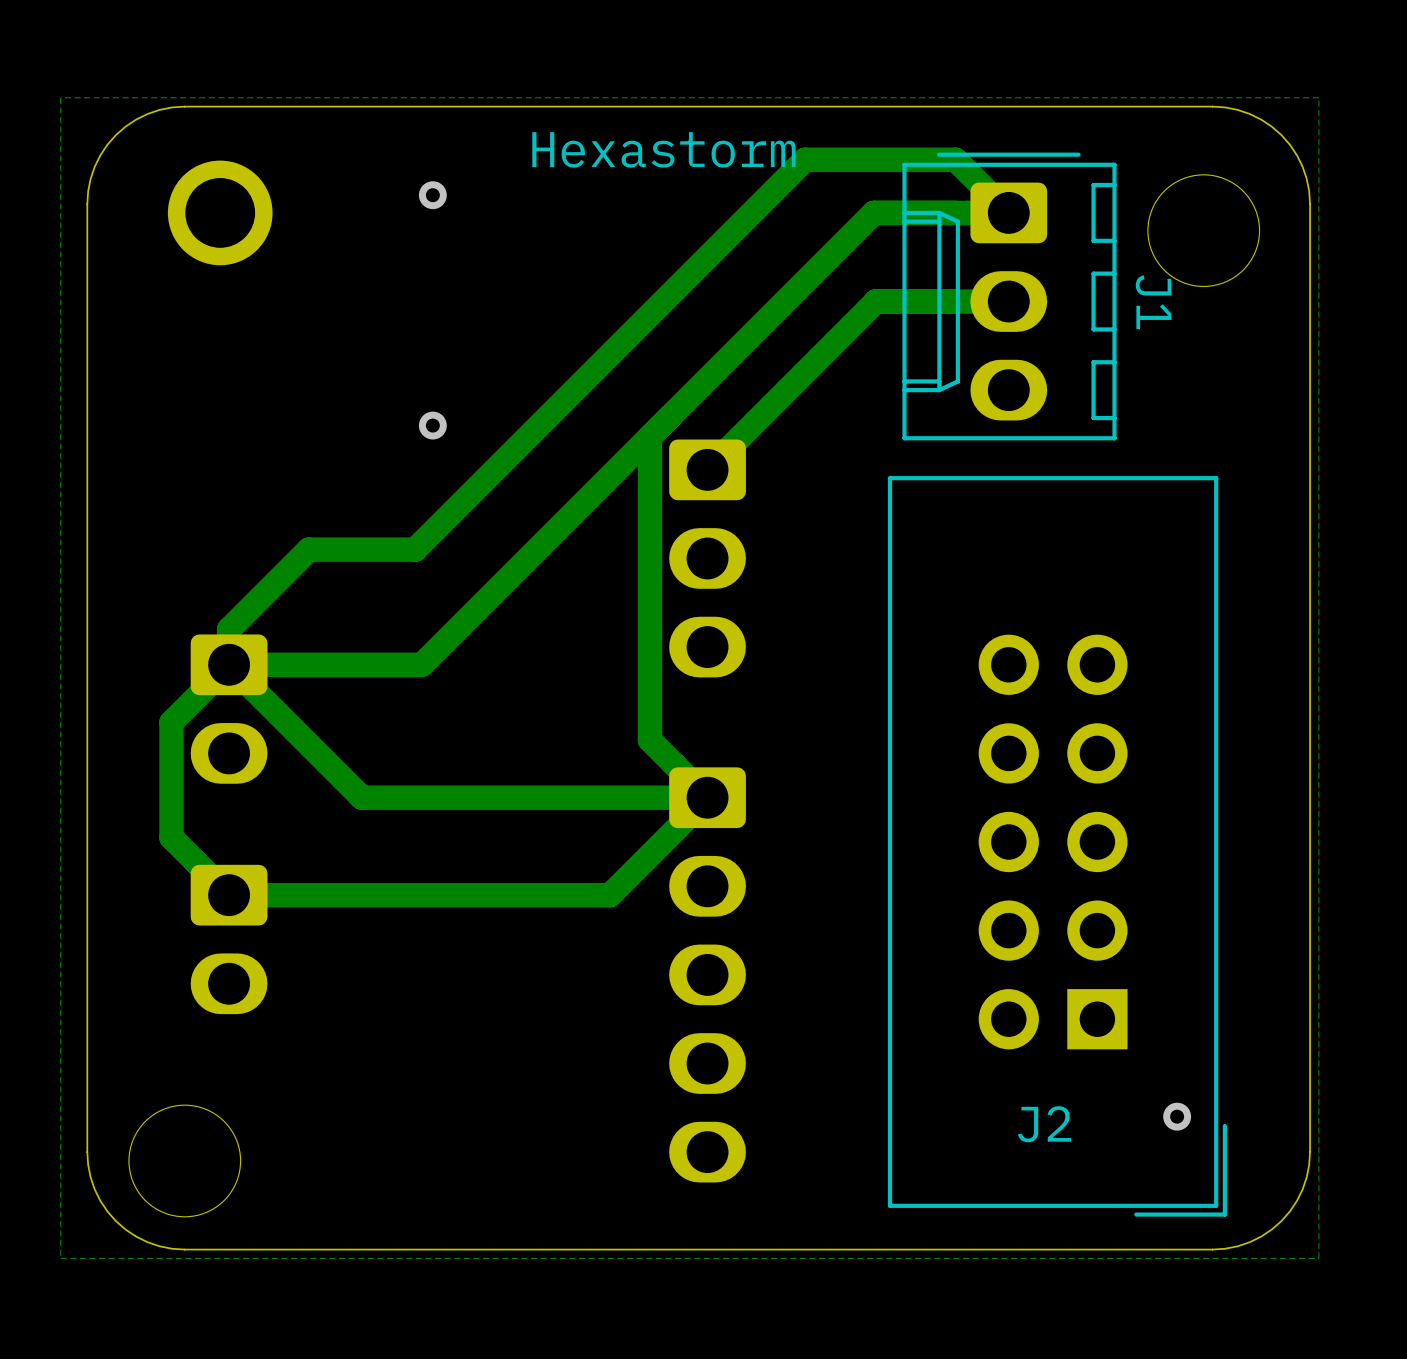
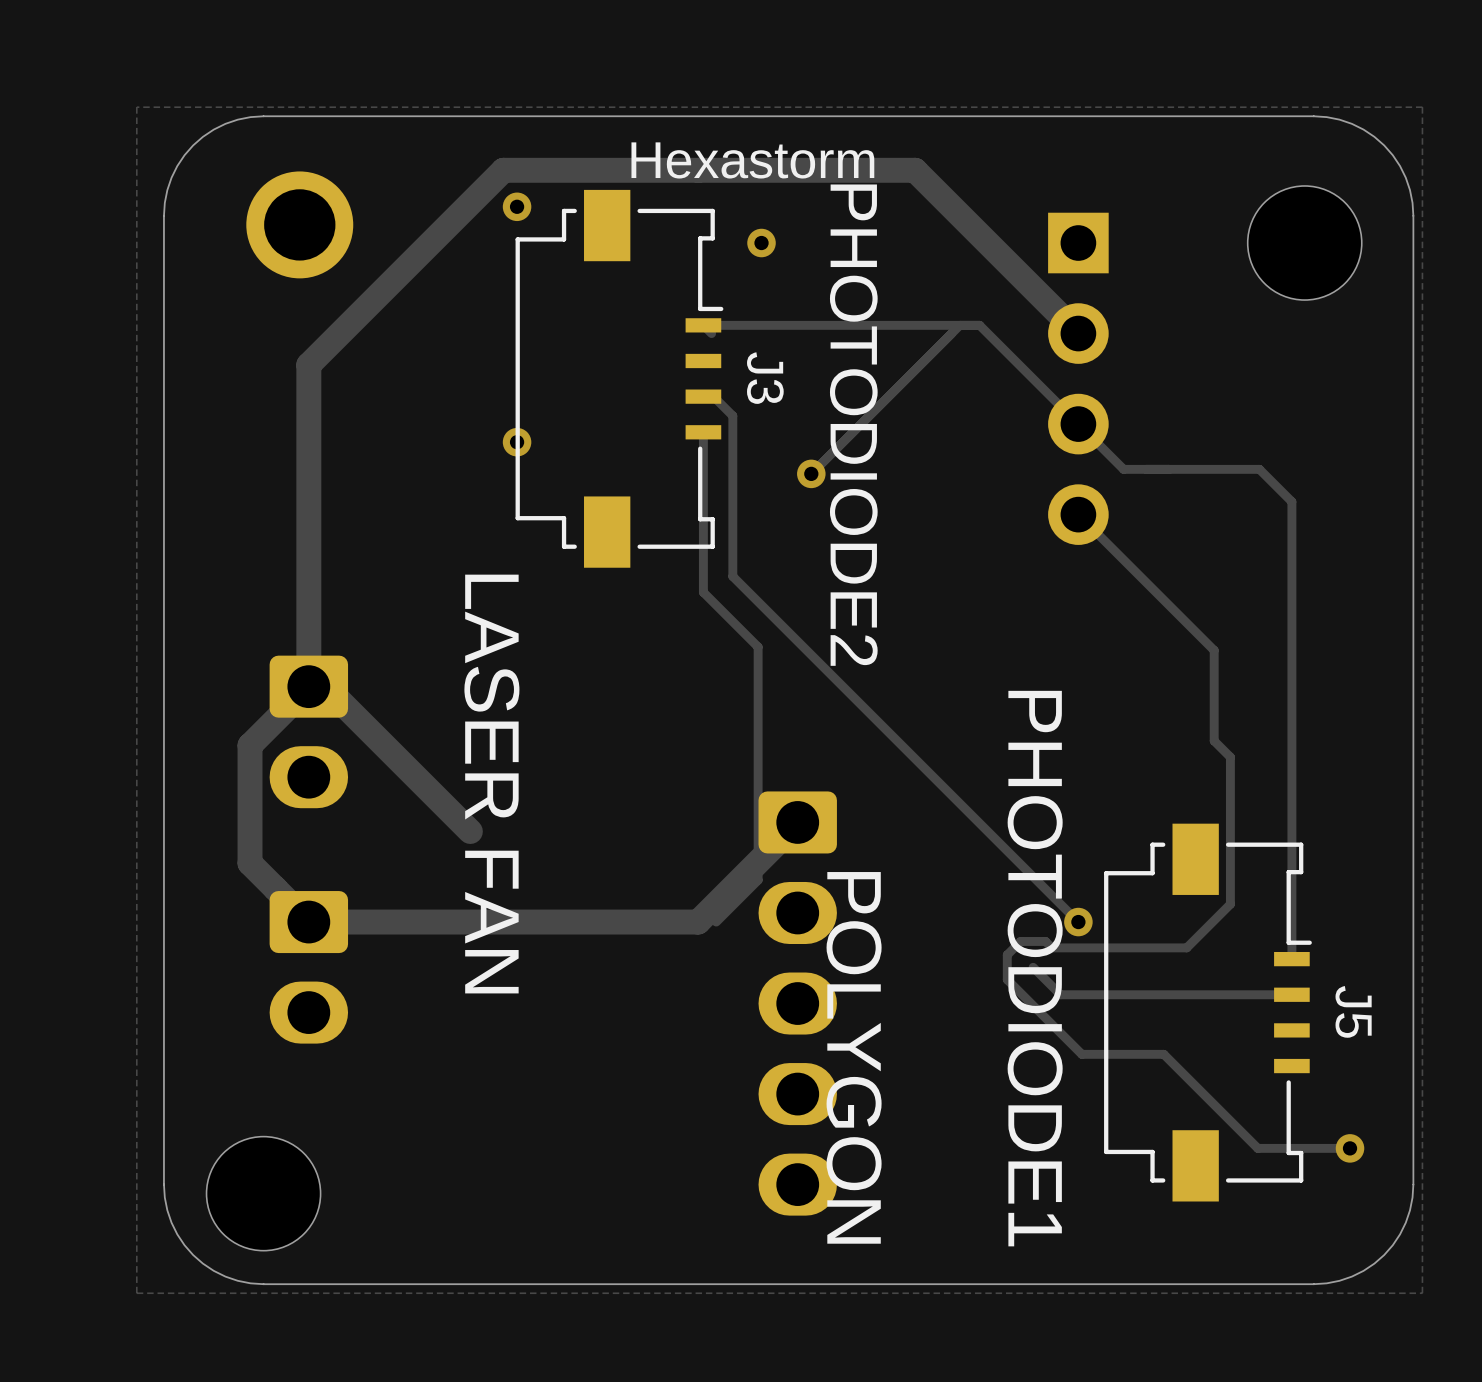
via: none -> (761, 243)
J1: (1009, 296) -> none
track: (1008, 301) (875, 301) (866, 311) -> none
track width: thick (866, 311) (720, 456) -> thin (959, 325) (811, 473)
track: none -> (711, 333) (703, 325) (979, 325) (1123, 469) (1259, 469) (1291, 501) (1291, 959)
track: none -> (1078, 333) (915, 170) (503, 170) (308, 364) (308, 650)
J3: none -> (619, 378)
part: none -> (1078, 378)
track: none -> (703, 396) (713, 396) (732, 415) (732, 576) (1078, 922)
text: none -> PHOTODIODE2 (853, 425)
track: none -> (703, 432) (703, 592) (758, 647) (758, 880) (716, 922)
track: (649, 436) (649, 740) (707, 797) (361, 797) (229, 664) -> none
via: none -> (811, 473)
track: none -> (1078, 514) (1214, 650) (1214, 740) (1230, 757) (1230, 904) (1186, 947) (1051, 947) (1045, 941) (1020, 941) (1007, 954) (1007, 979) (1081, 1054) (1163, 1054) (1257, 1148) (1350, 1148)
part: (707, 558) -> none
track: (229, 629) (308, 549) (415, 549) (805, 159) (955, 159) (1008, 212) (873, 212) (421, 664) (245, 664) -> (470, 831) (325, 686)
text: none -> LASER (491, 697)
J2: (1057, 846) -> none
text: none -> FAN (491, 922)
via: none -> (1078, 922)
track: none -> (1033, 967) (1060, 994) (1291, 994)
text: none -> PHOTODIODE1 (1035, 968)
J5: none -> (1207, 1012)
text: none -> POLYGON (854, 1057)
via position: (1177, 1116) -> (1350, 1148)

